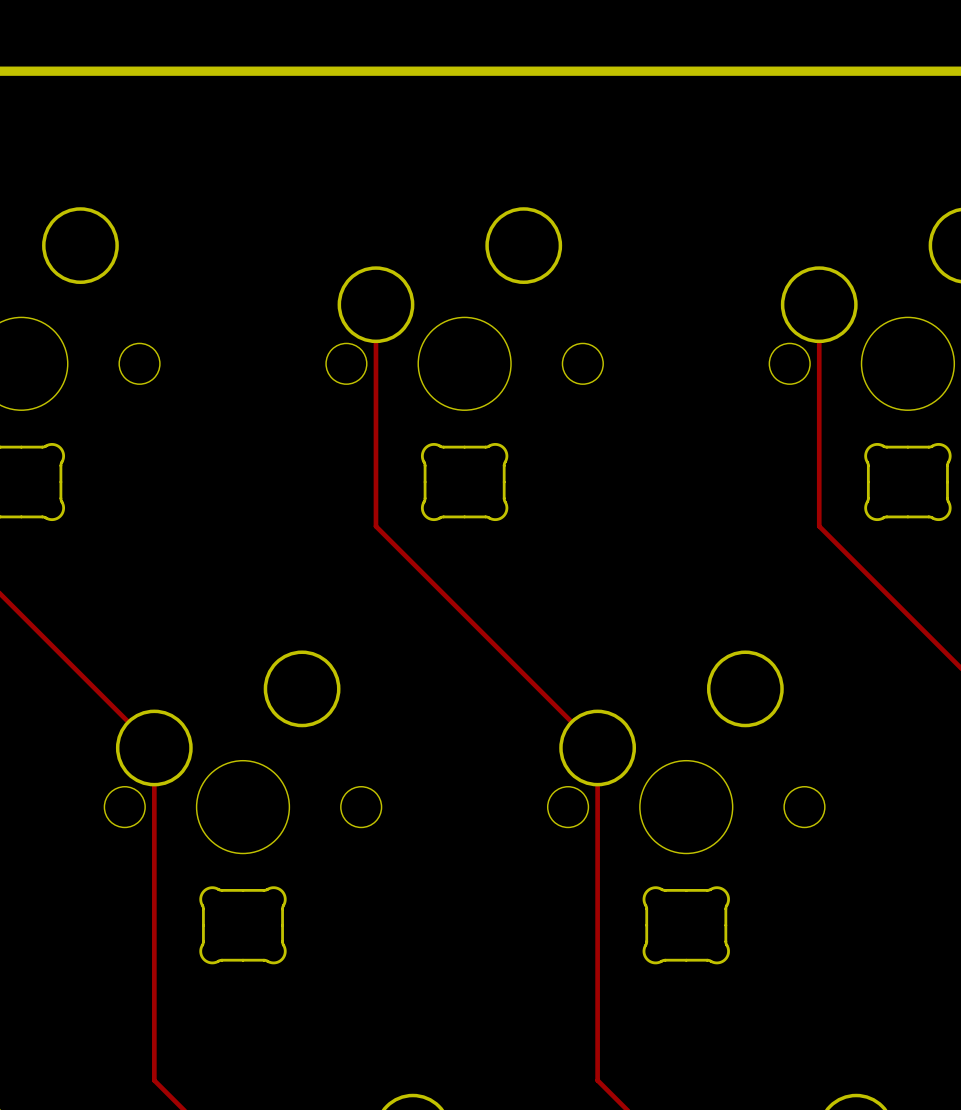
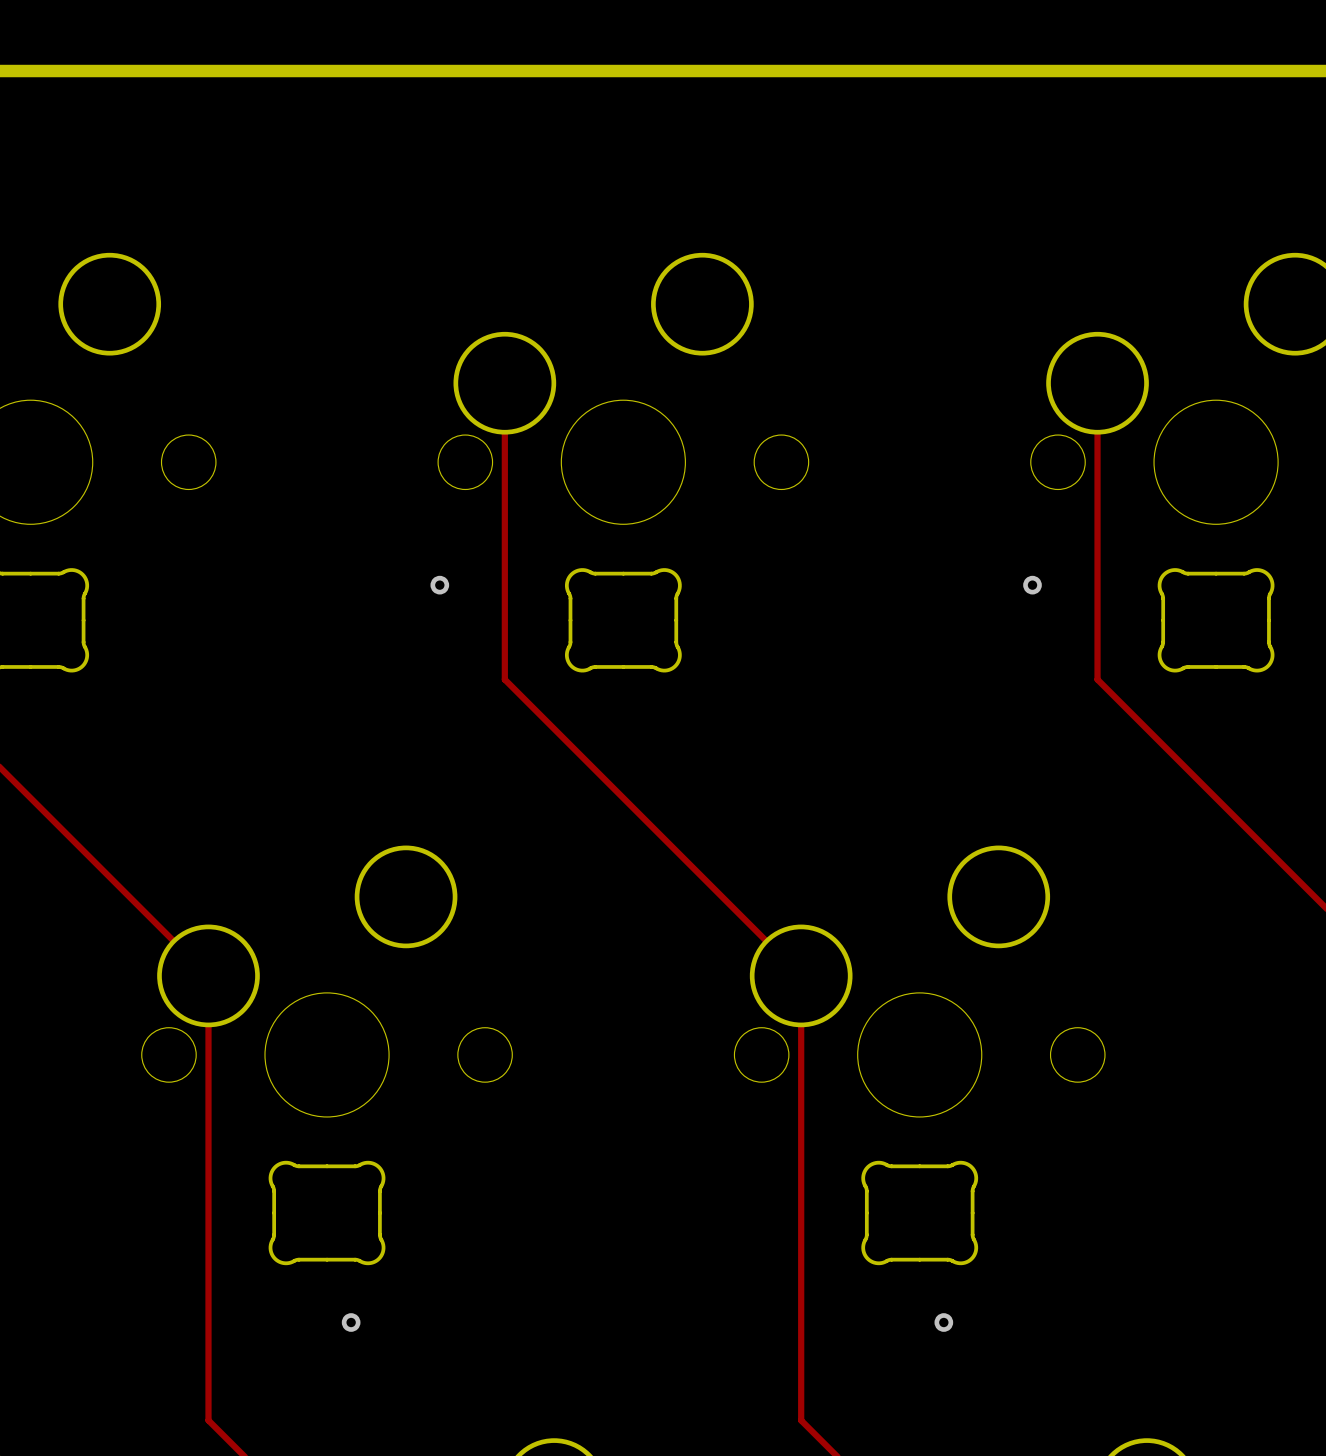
via: none -> (439, 585)
via: none -> (1032, 585)
via: none -> (351, 1322)
via: none -> (943, 1322)

